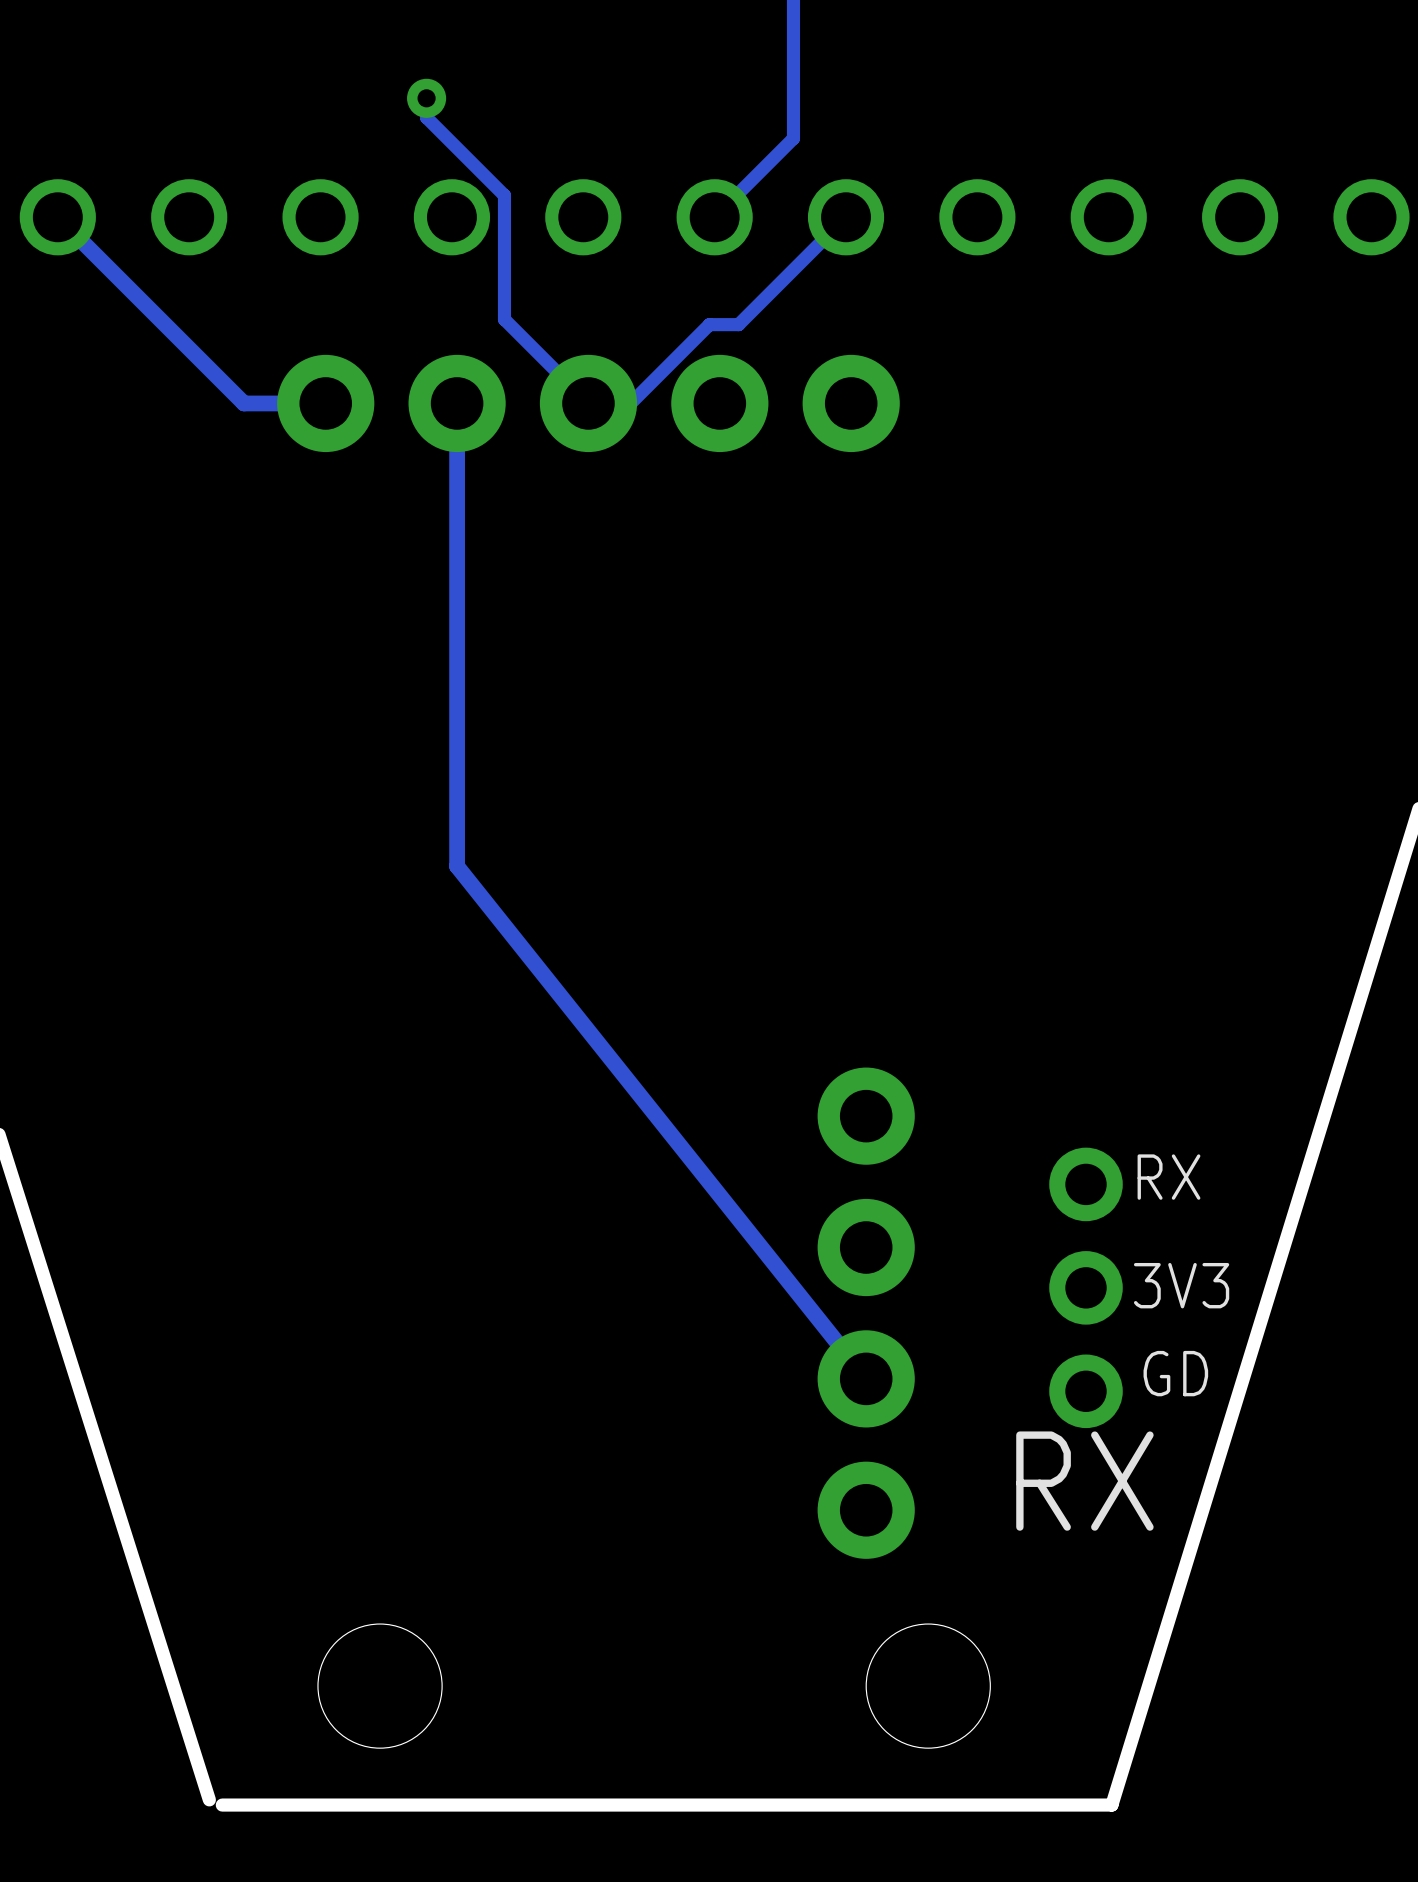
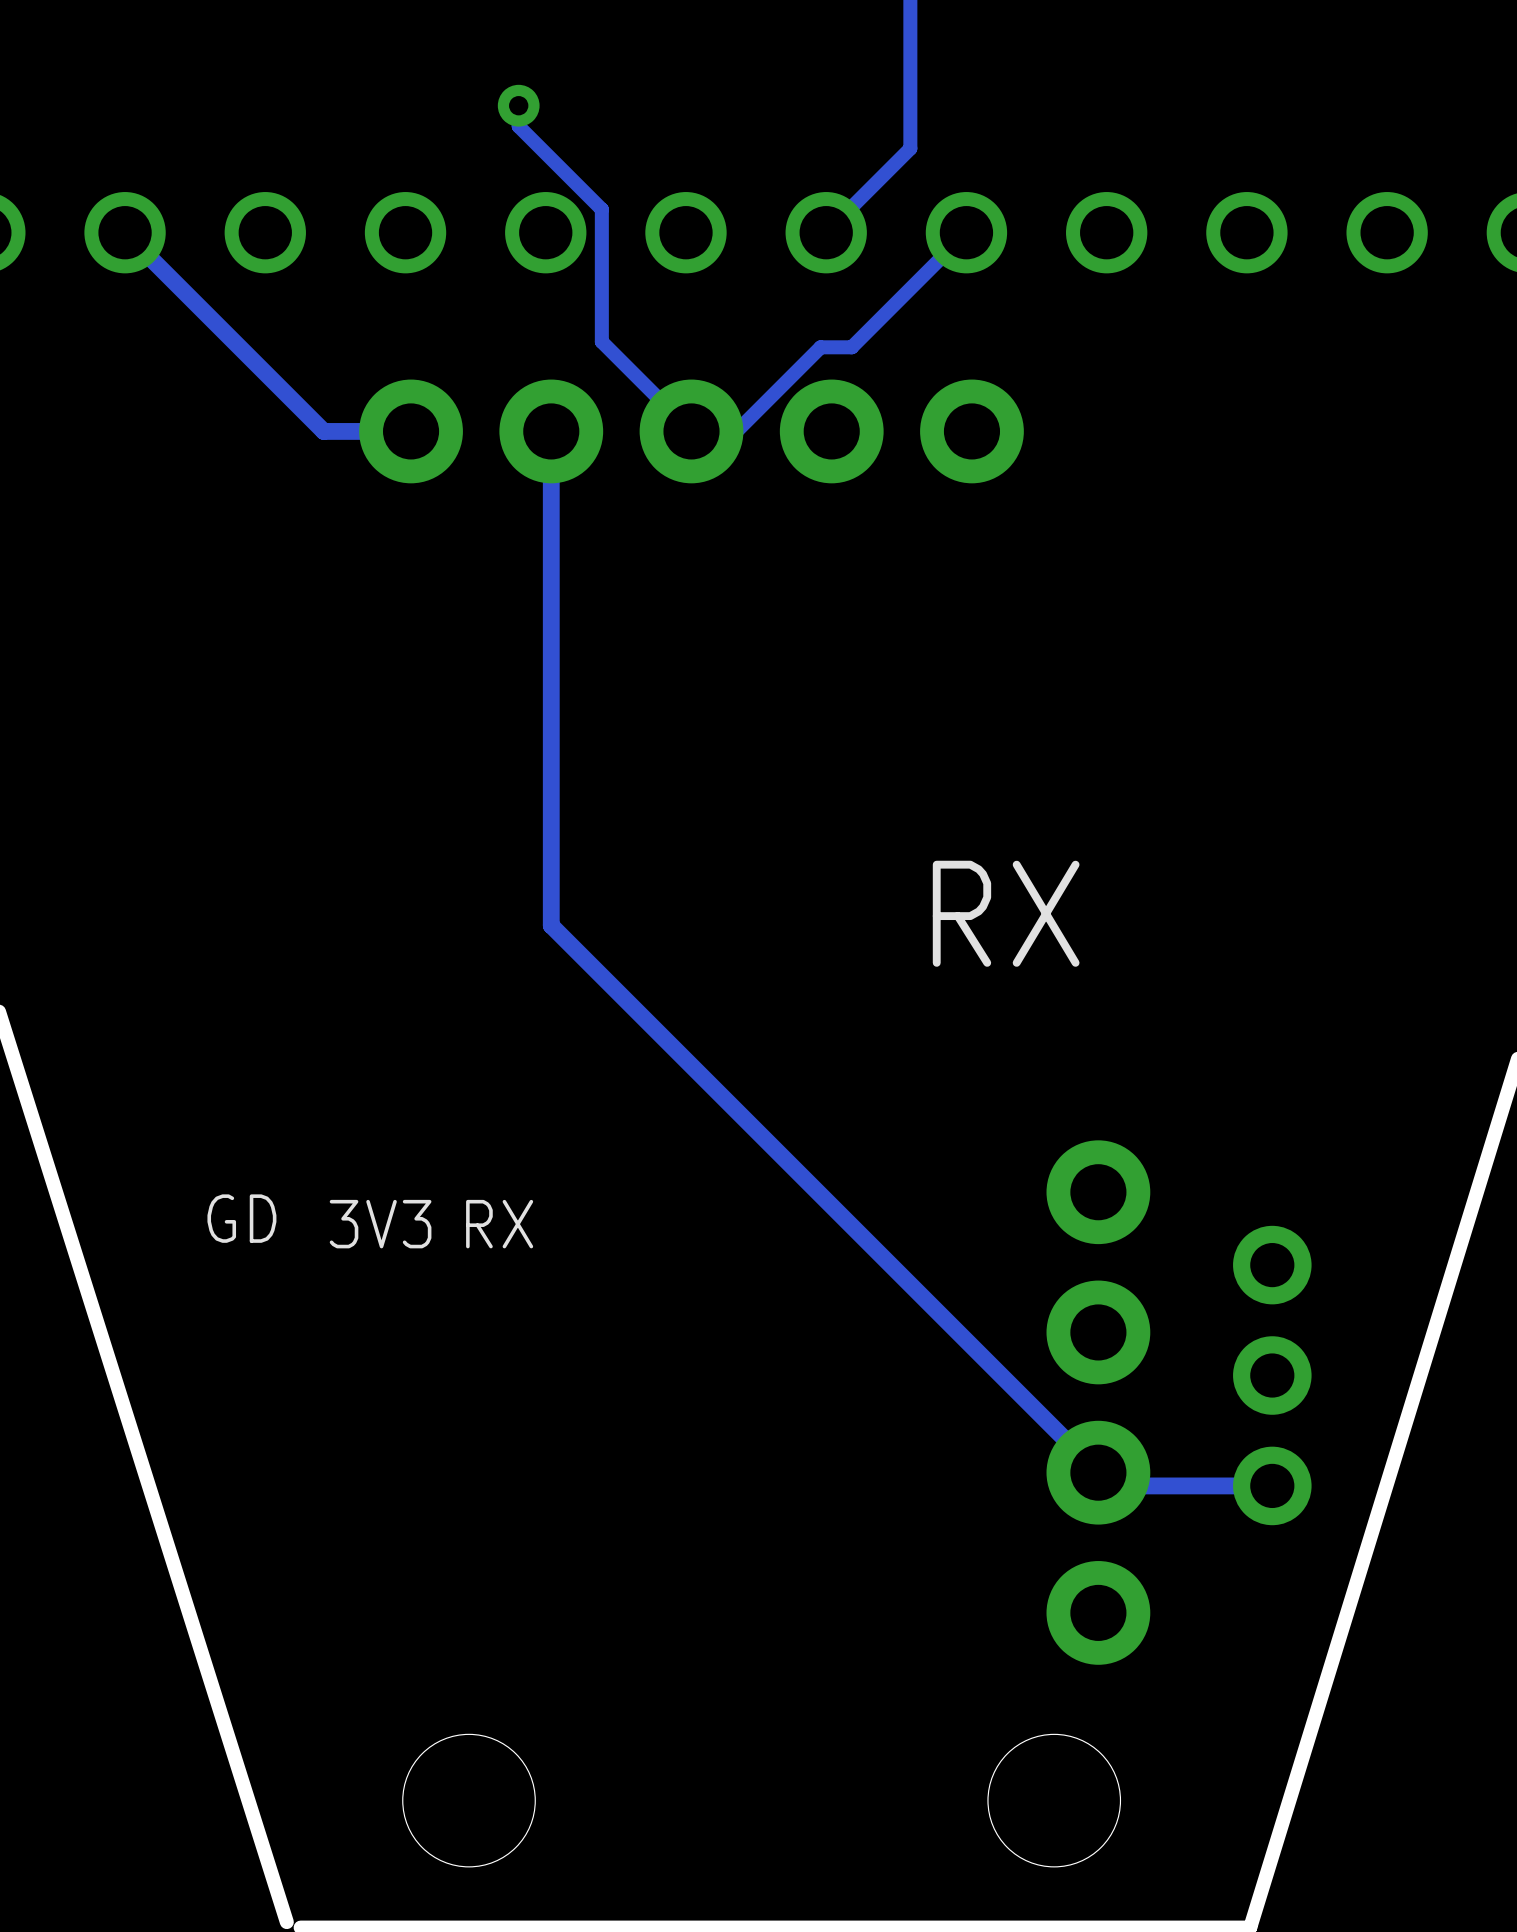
text: none -> RX (1006, 913)
track: (457, 866) (866, 1378) -> (551, 925) (1111, 1485) (1272, 1485)
text: none -> RX (499, 1224)
text: RX (1168, 1177) -> none
text position: 3V3 (1181, 1285) -> 3V3 (380, 1224)
part position: (1086, 1287) -> (1272, 1375)
part position: (866, 1313) -> (1098, 1402)
text position: GD (1175, 1373) -> GD (241, 1218)
text: RX (1084, 1481) -> none

